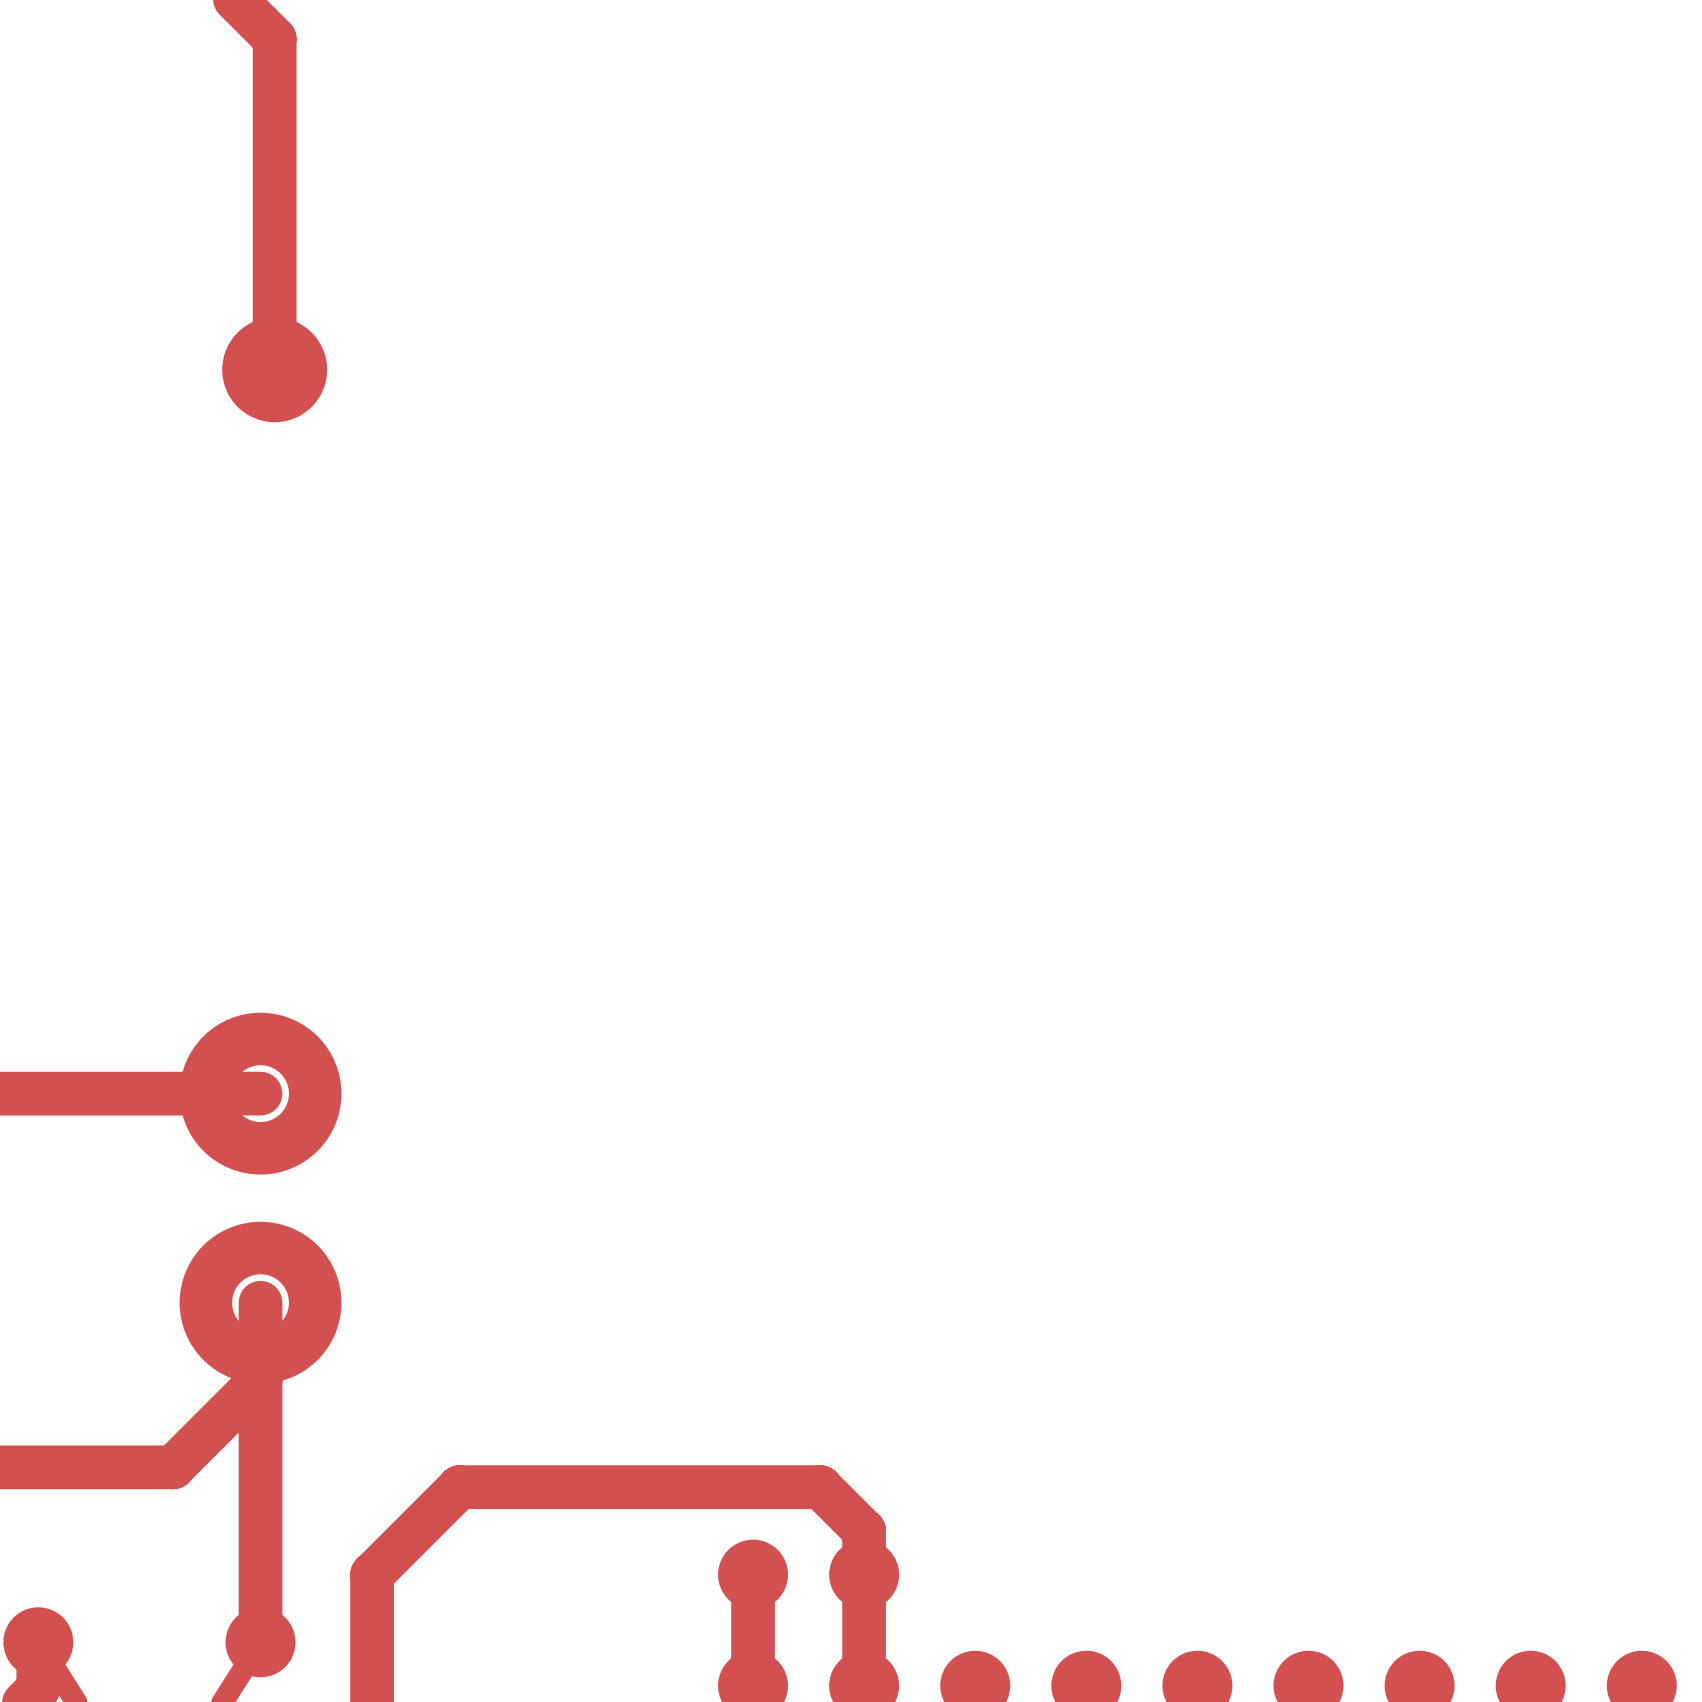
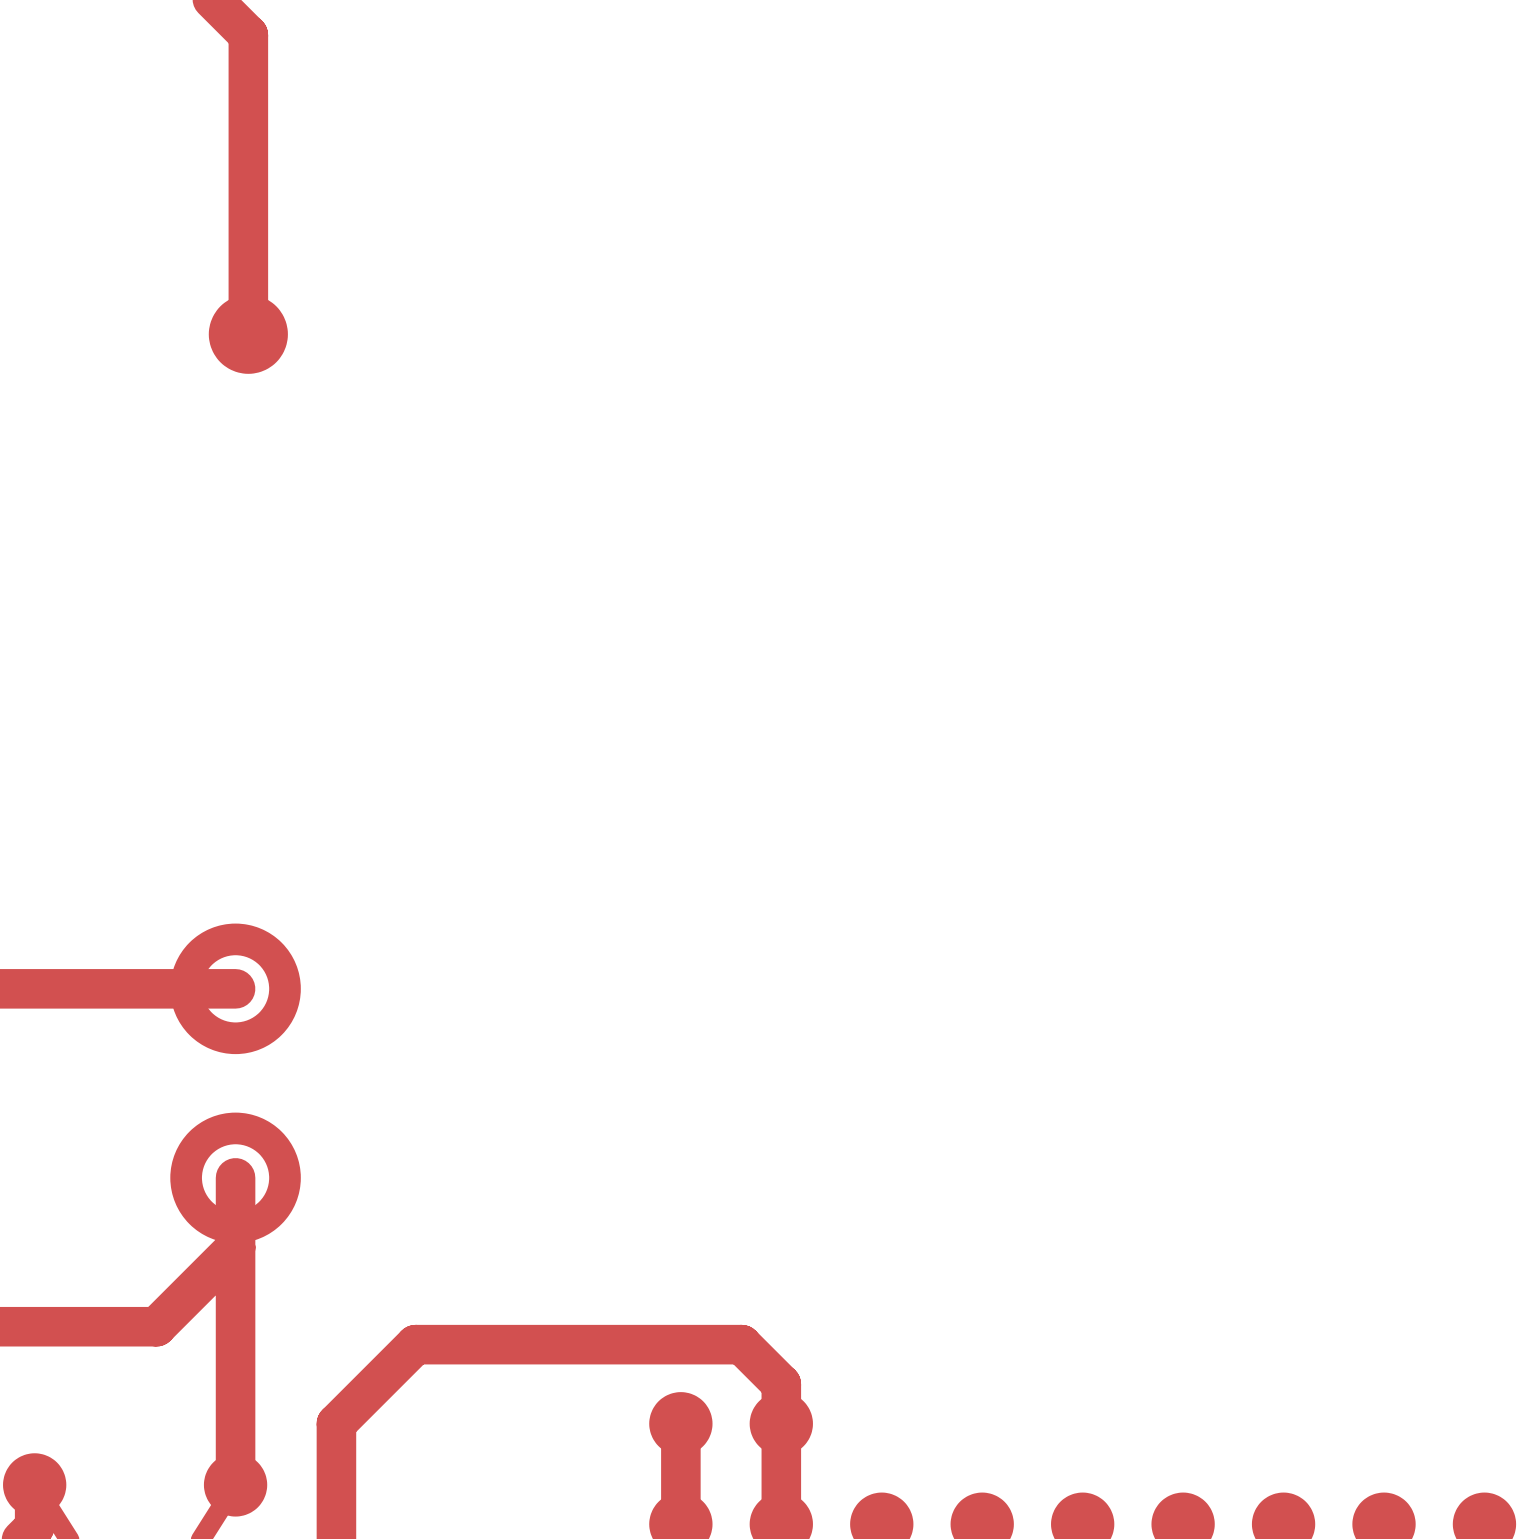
drawing shape: [222, 317, 328, 423] -> [208, 294, 288, 374]
drawing shape: [179, 1012, 342, 1175] -> [170, 923, 301, 1055]
drawing shape: [179, 1221, 342, 1384] -> [170, 1112, 301, 1244]

